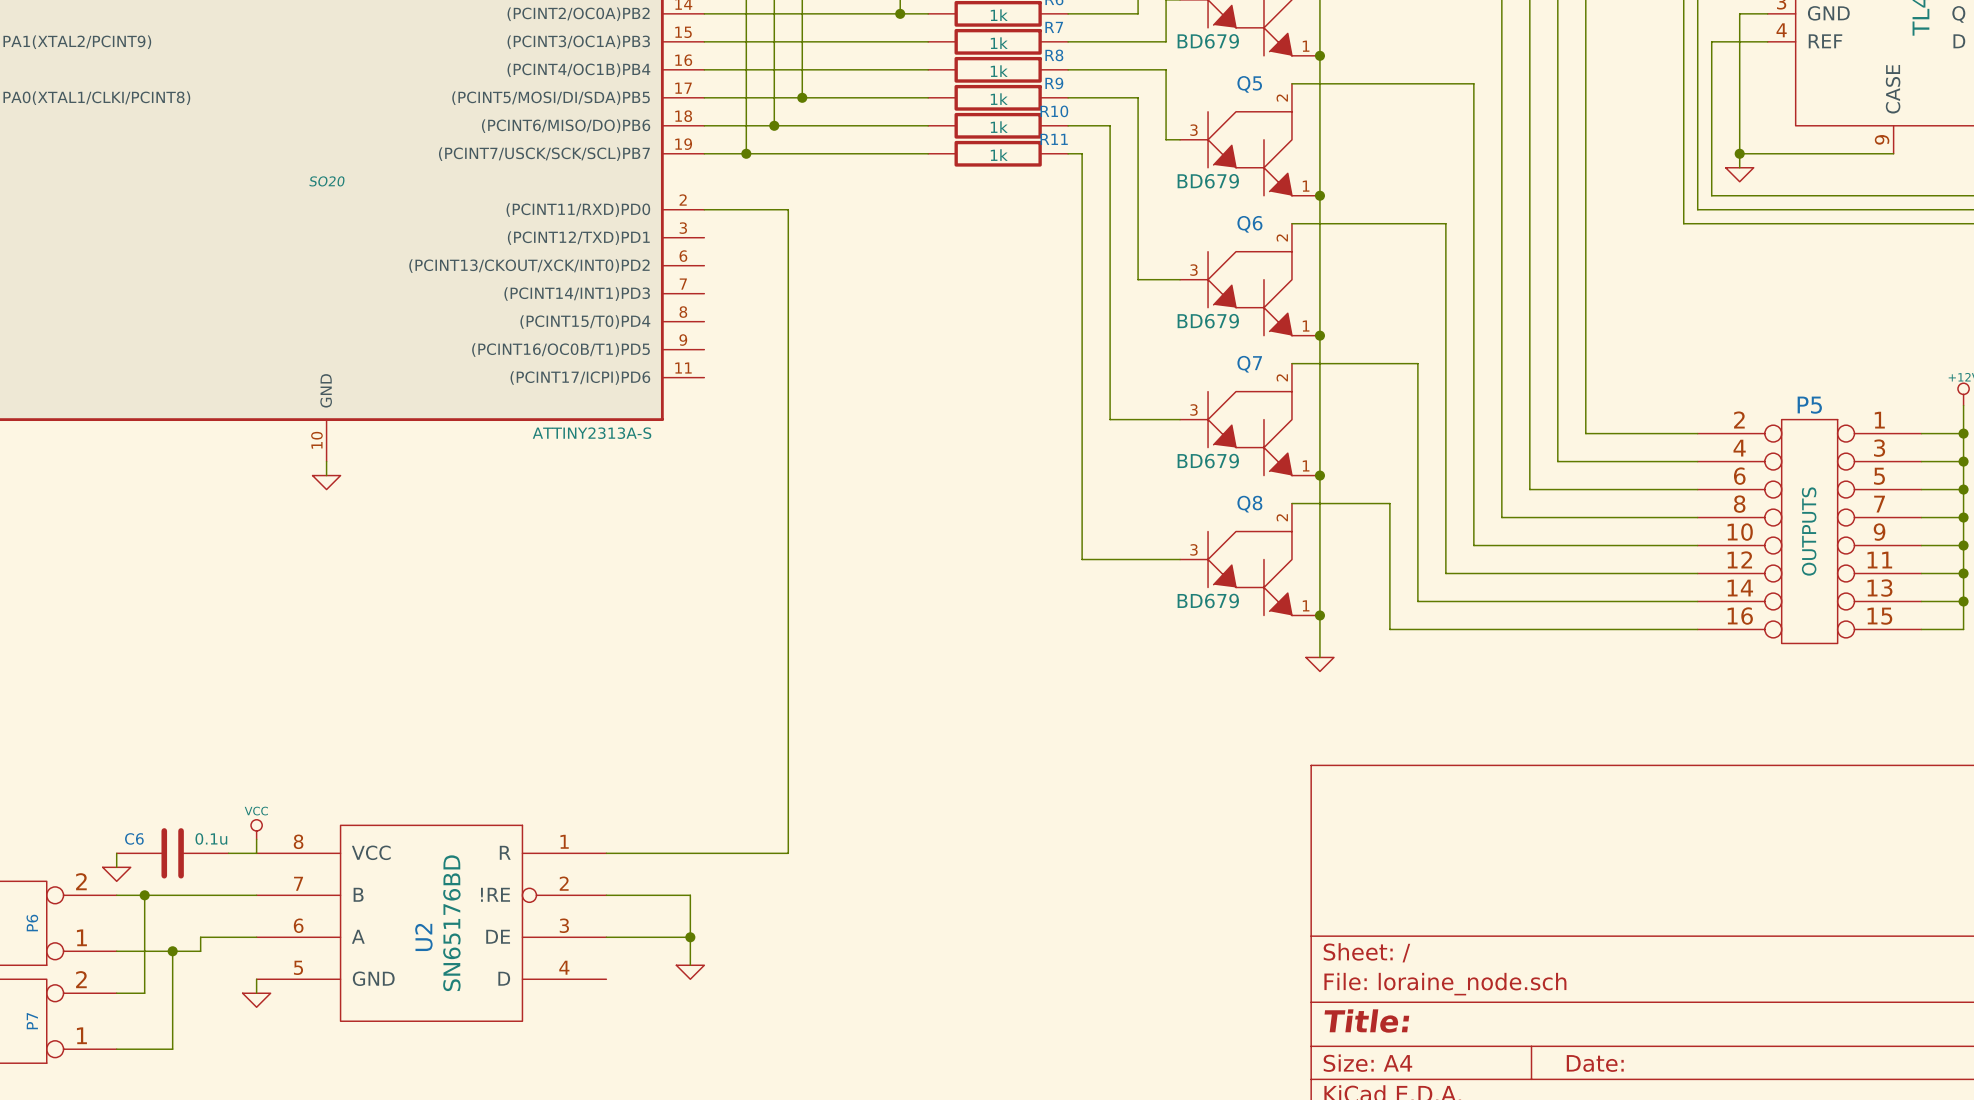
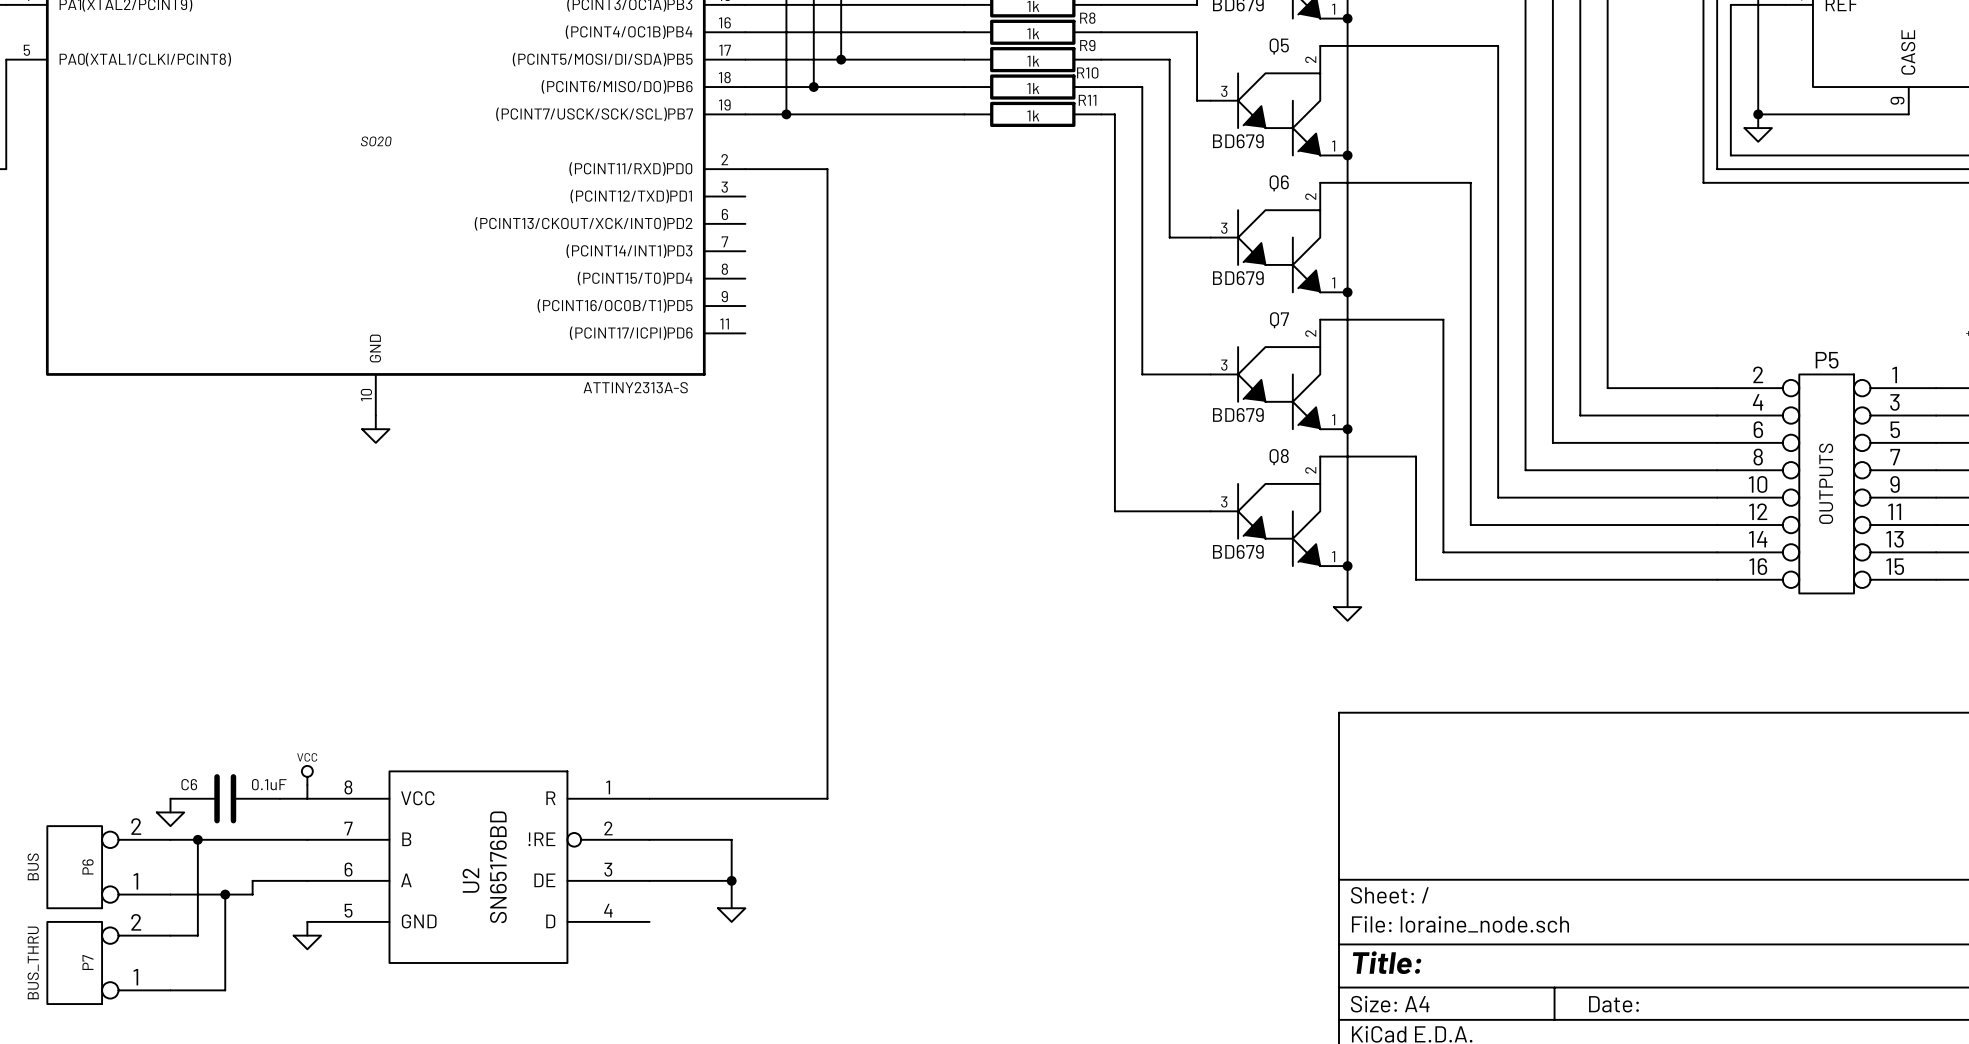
C6 value: 0.1u (211, 838) -> 0.1uF (269, 784)

